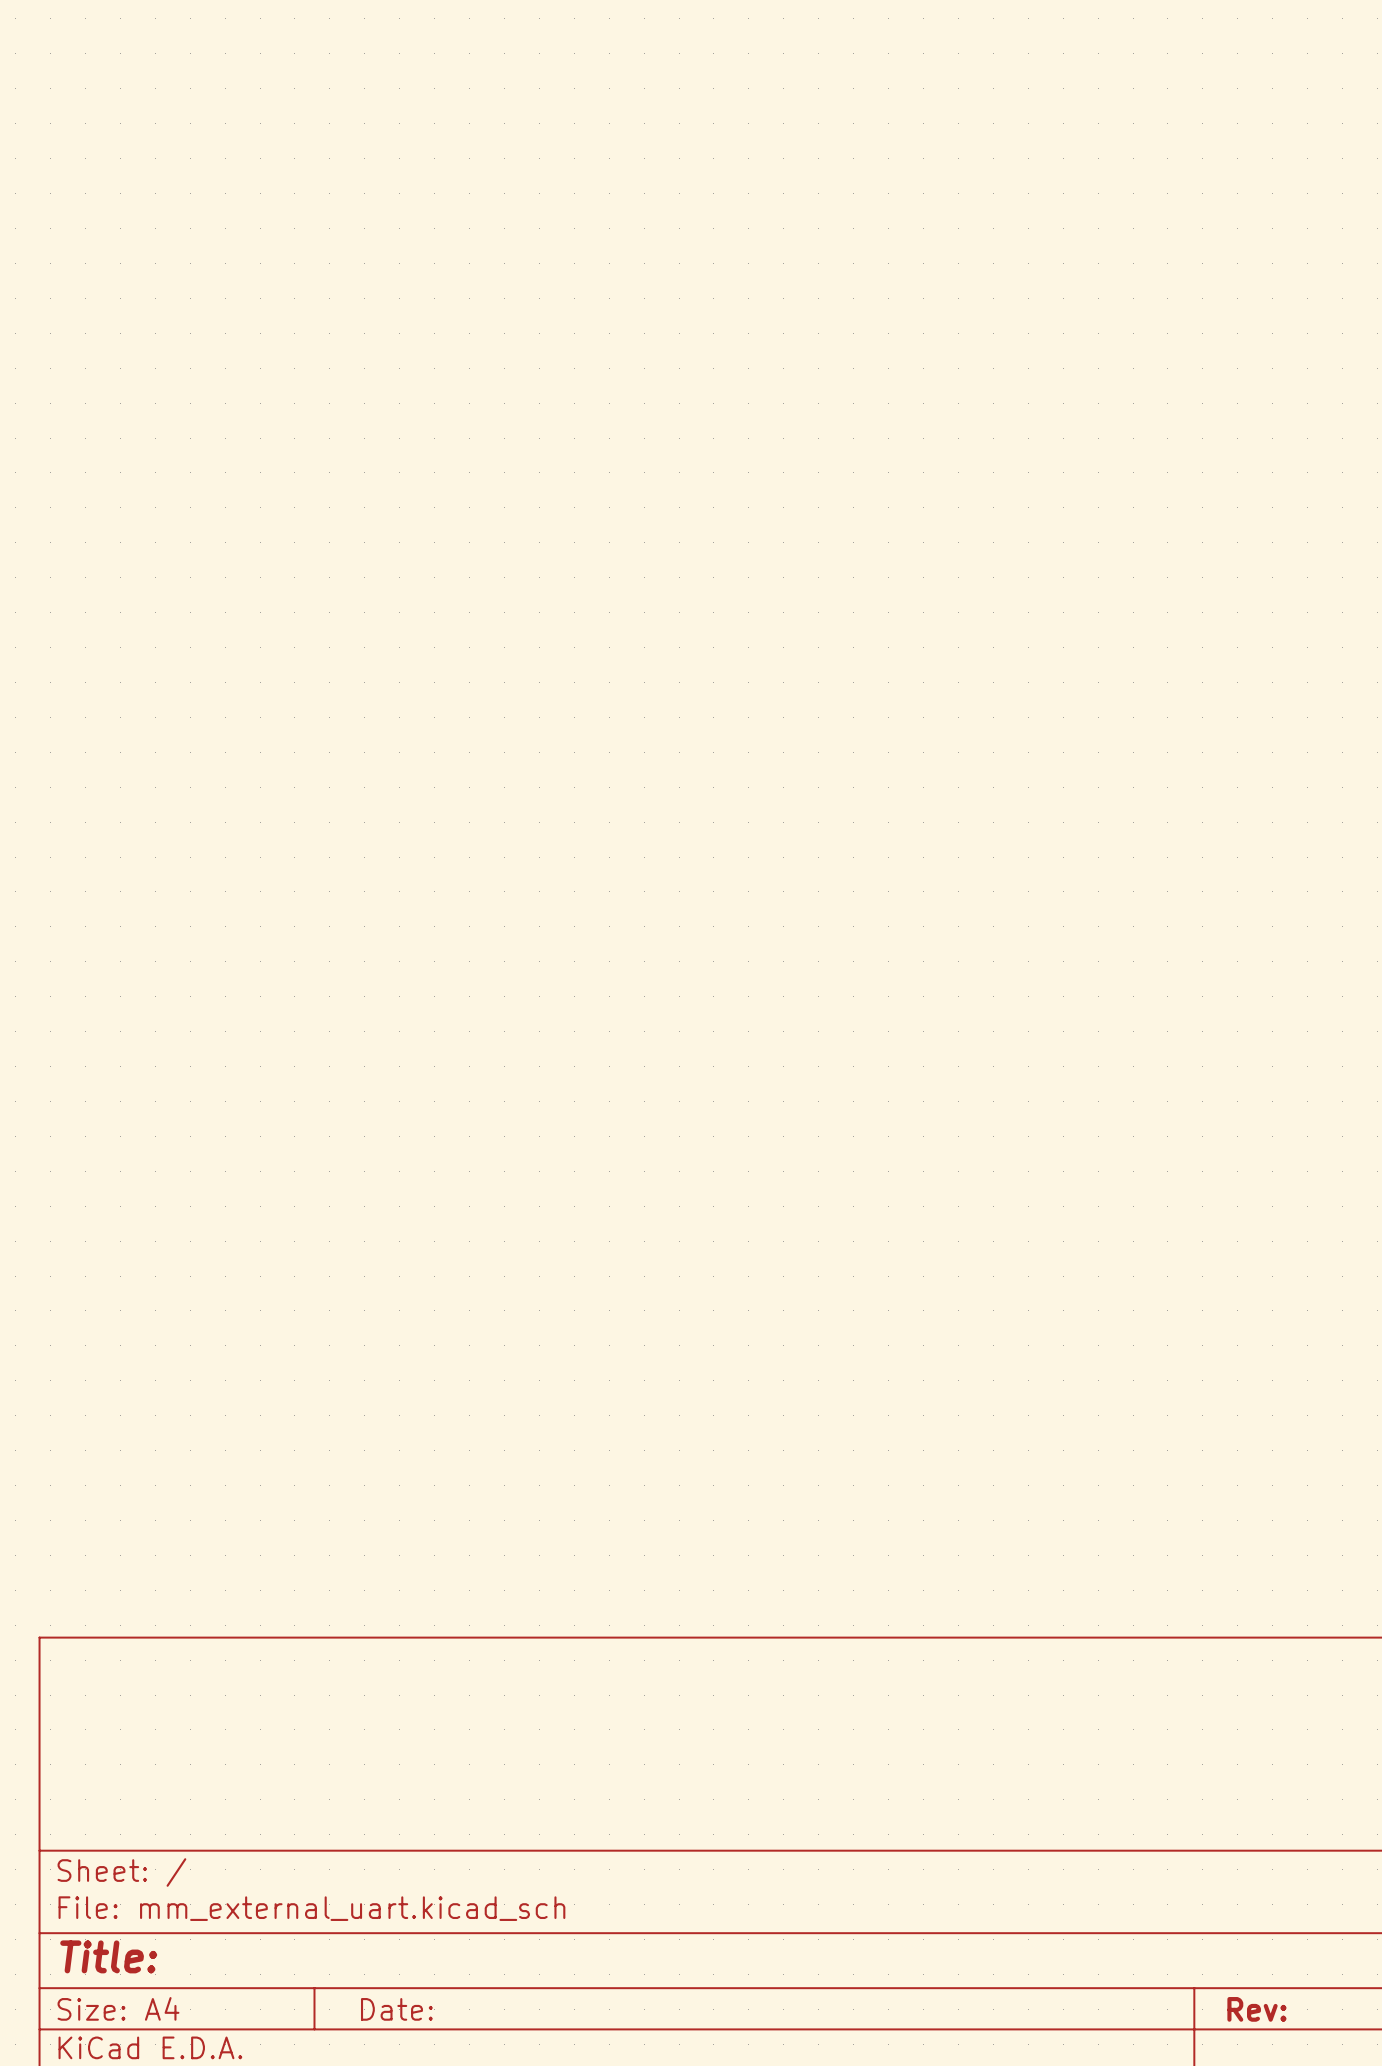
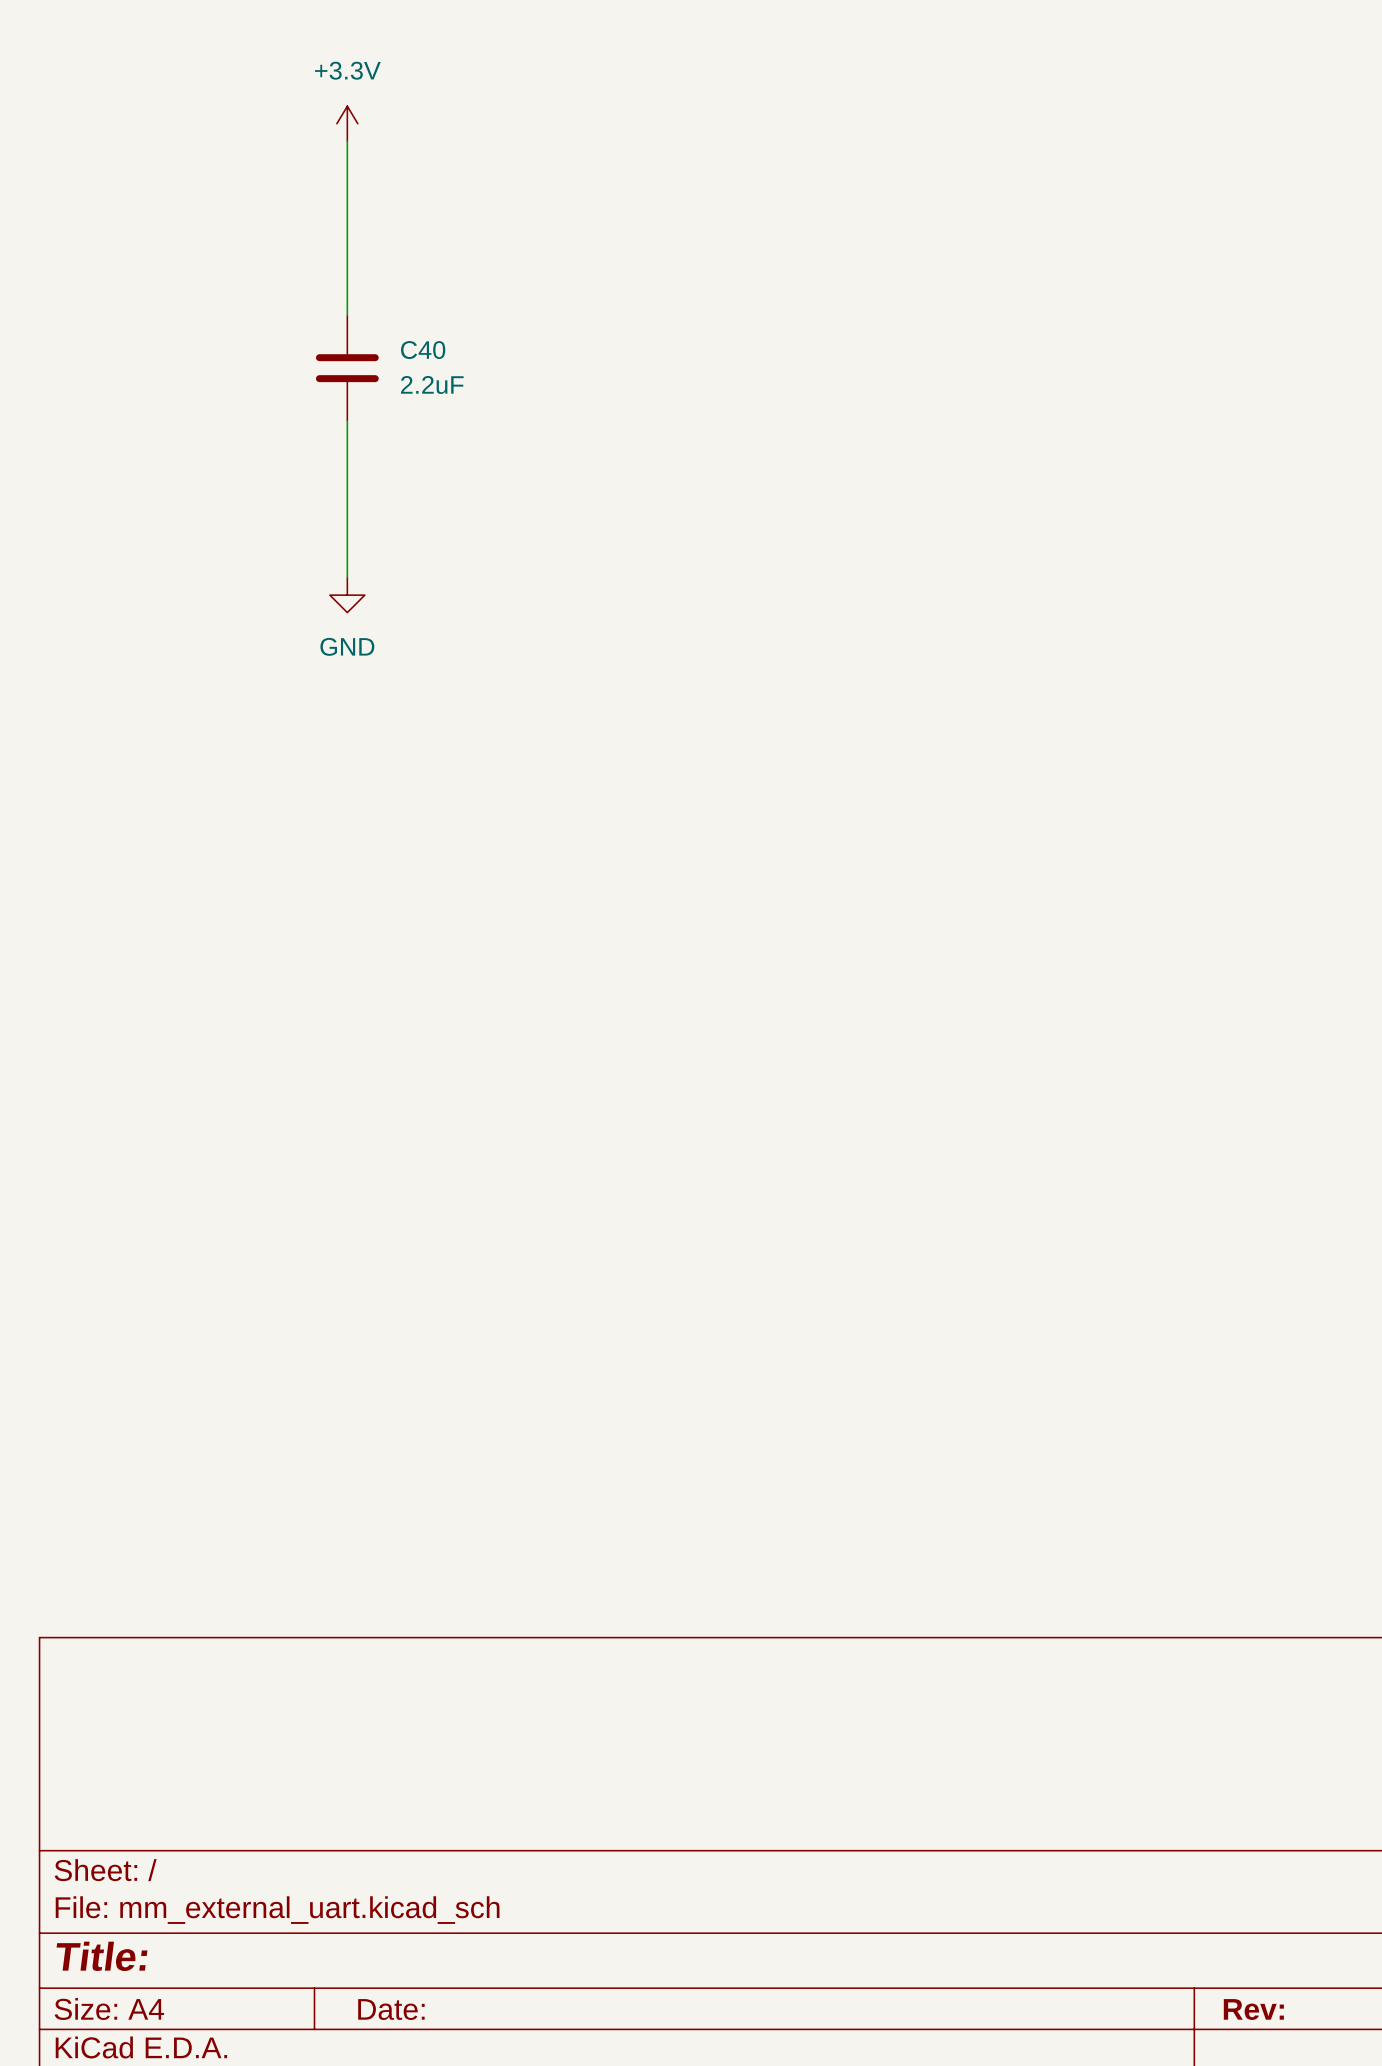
power symbol: none -> +3.3V (347, 123)
wire: none -> (347, 141) (347, 315)
C40: none -> 2.2uF (347, 368)
wire: none -> (347, 420) (347, 577)
power symbol: none -> GND (347, 595)

